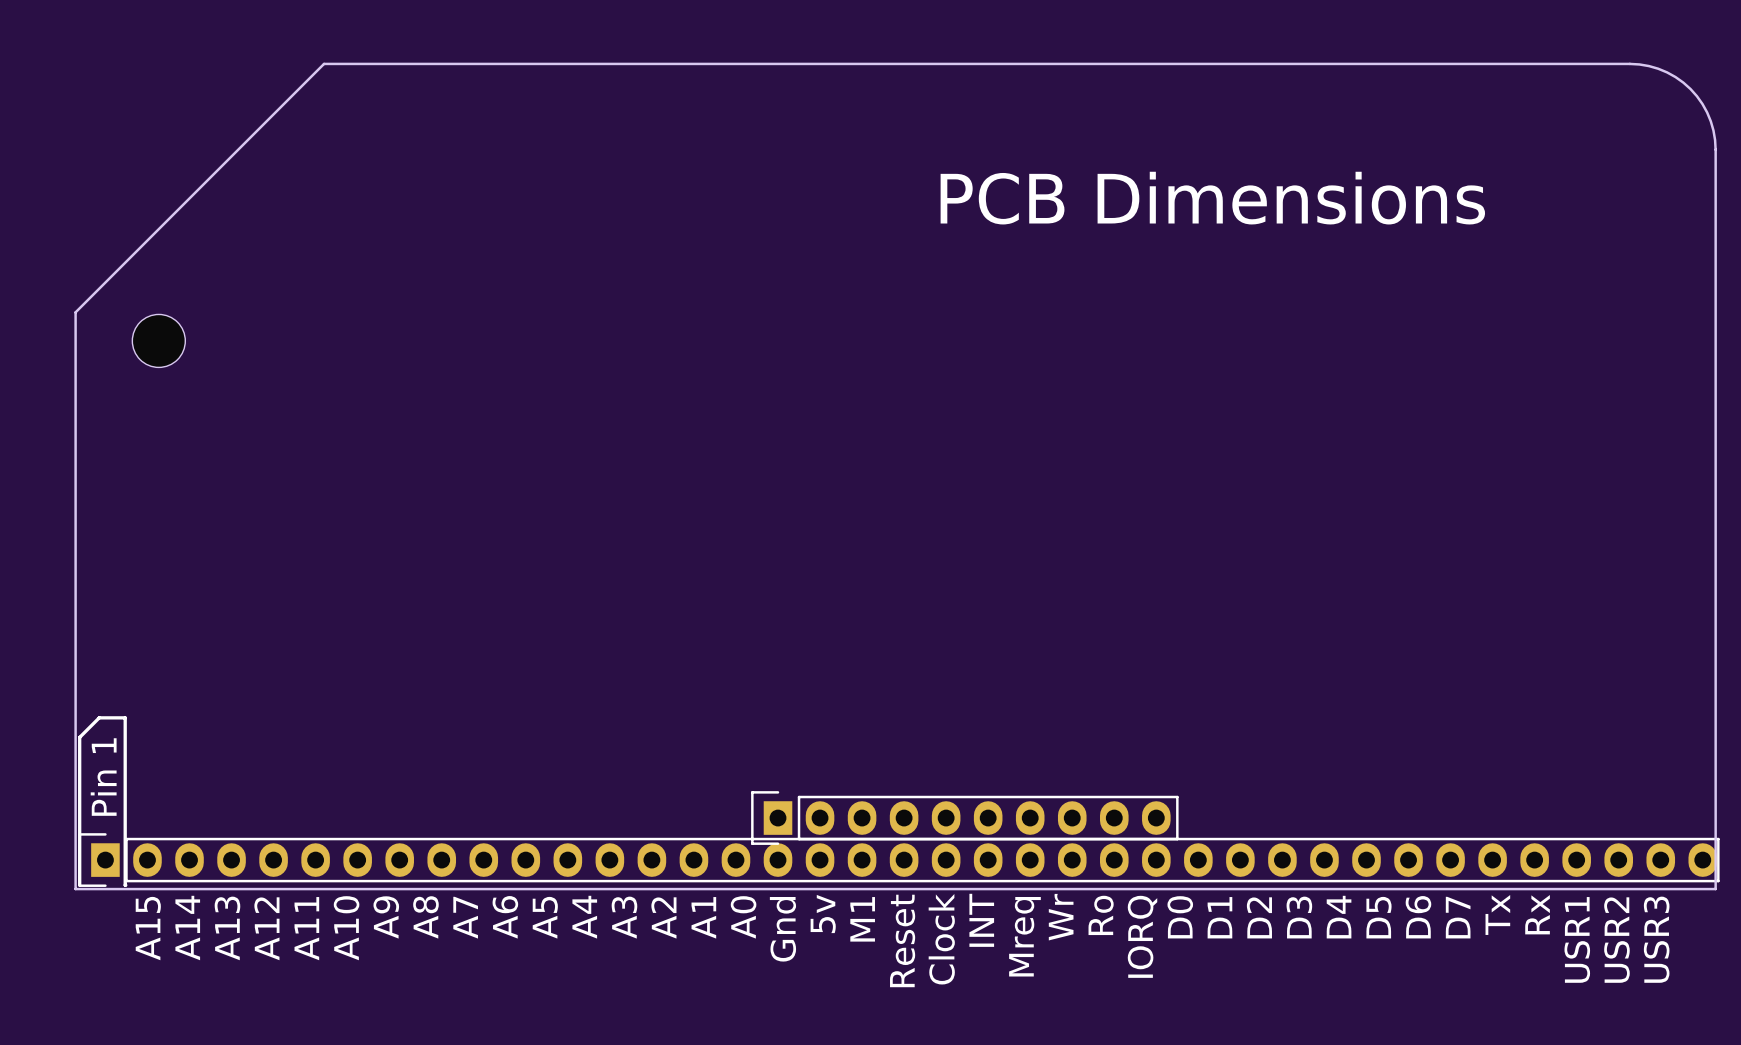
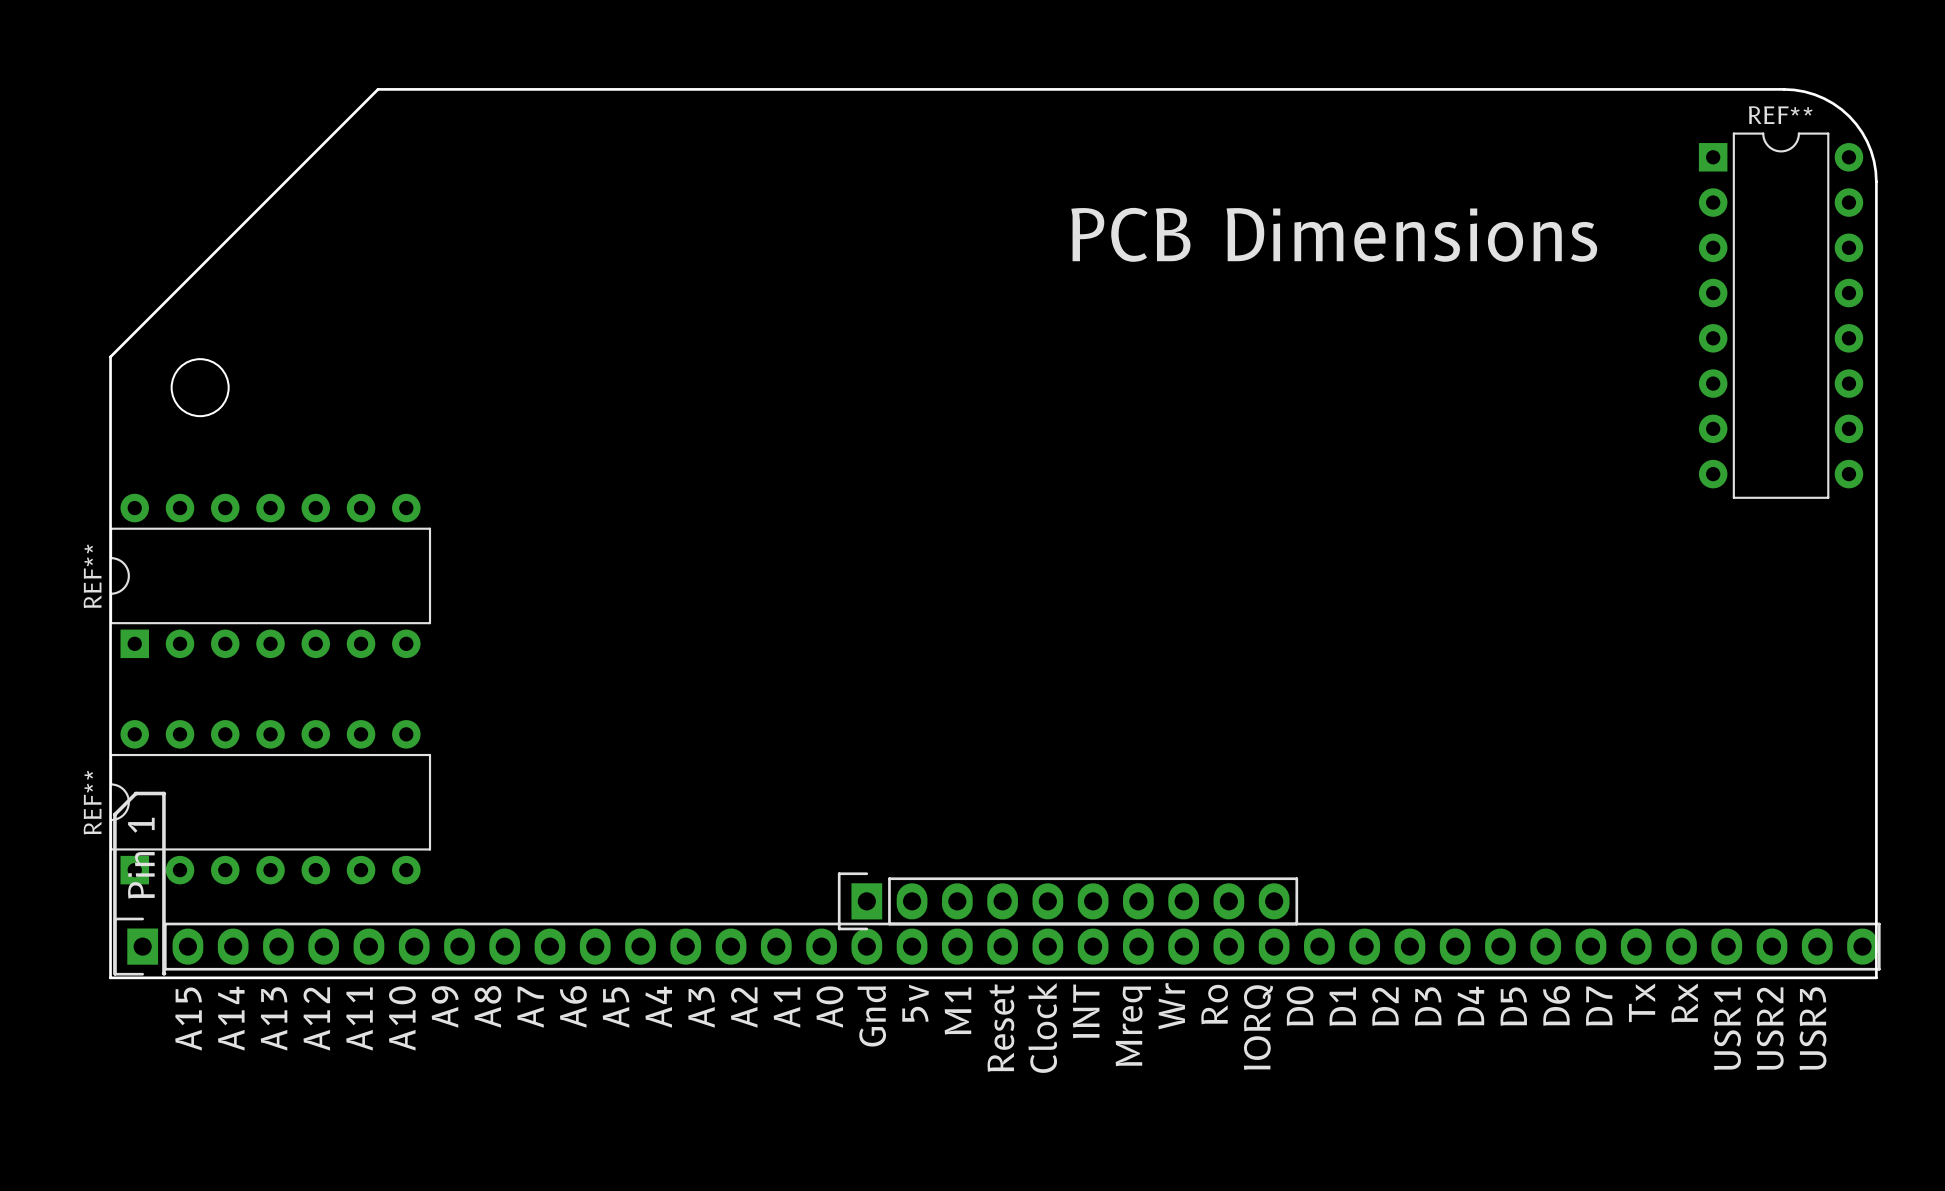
REF**: none -> (1781, 315)
REF**: none -> (270, 575)
REF**: none -> (270, 802)

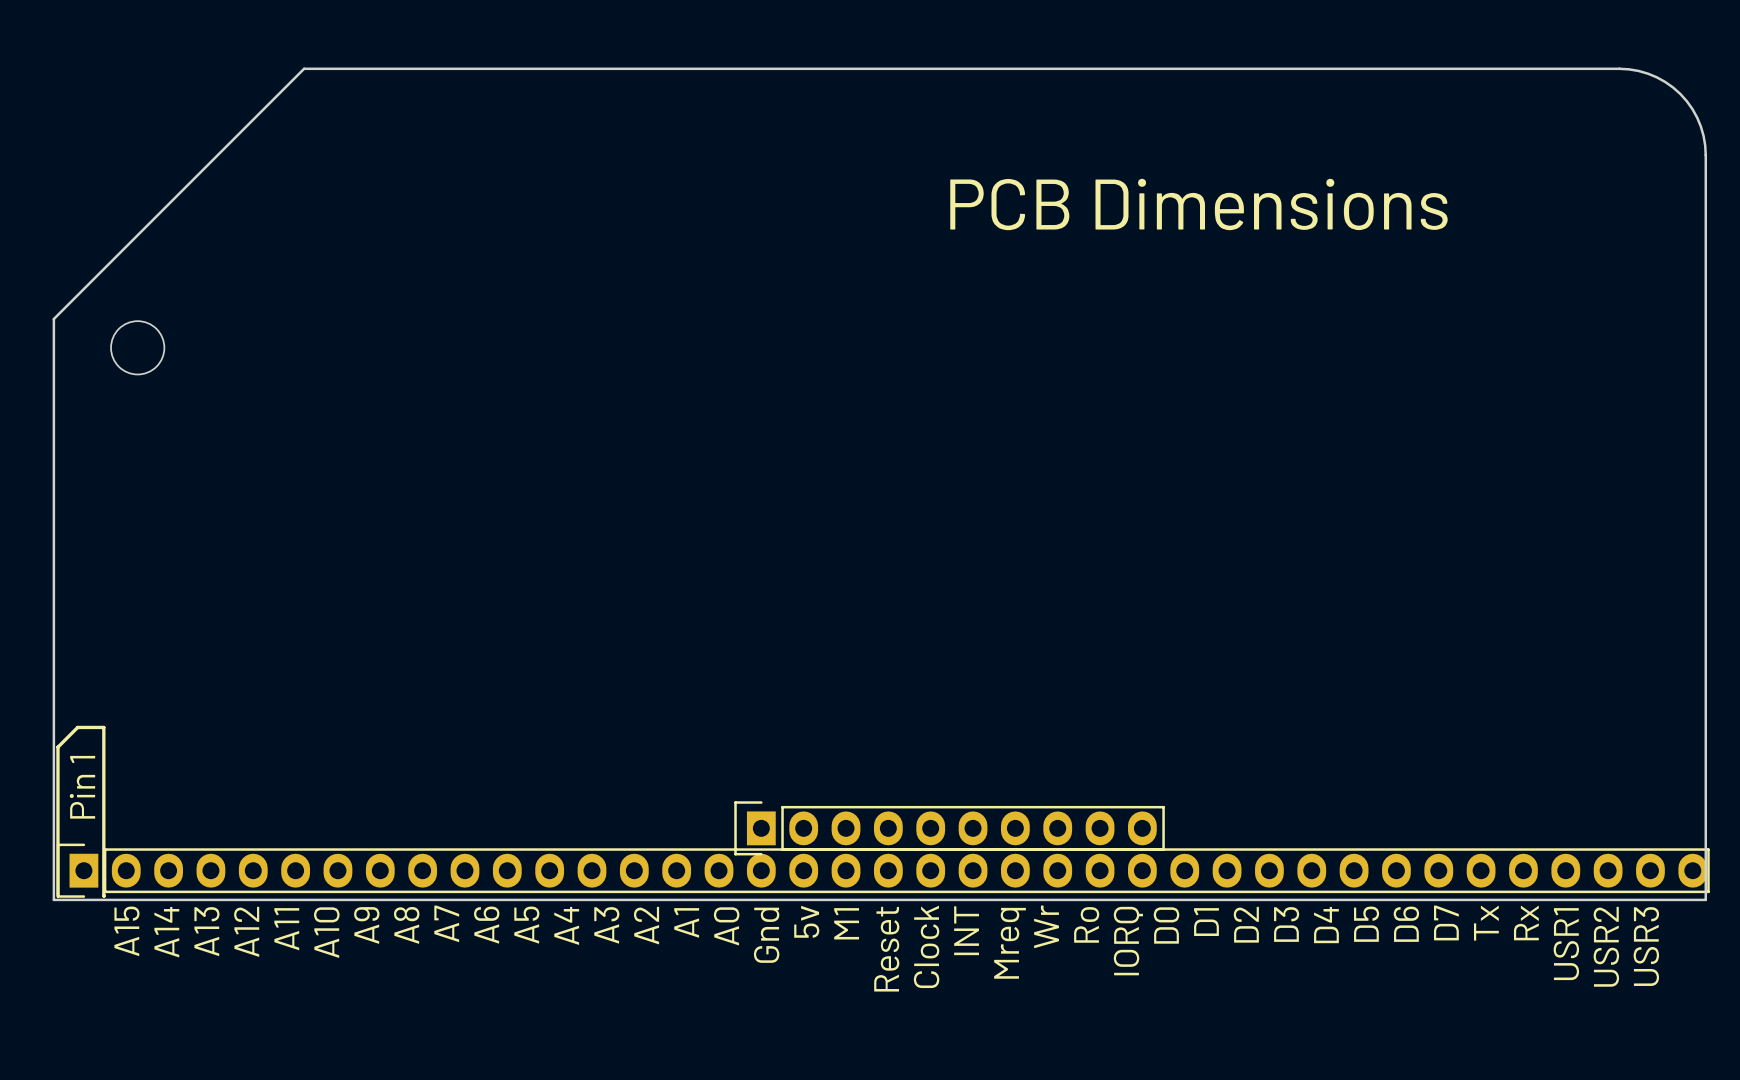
REF**: (1781, 315) -> none
REF**: (270, 575) -> none
REF**: (270, 802) -> none

